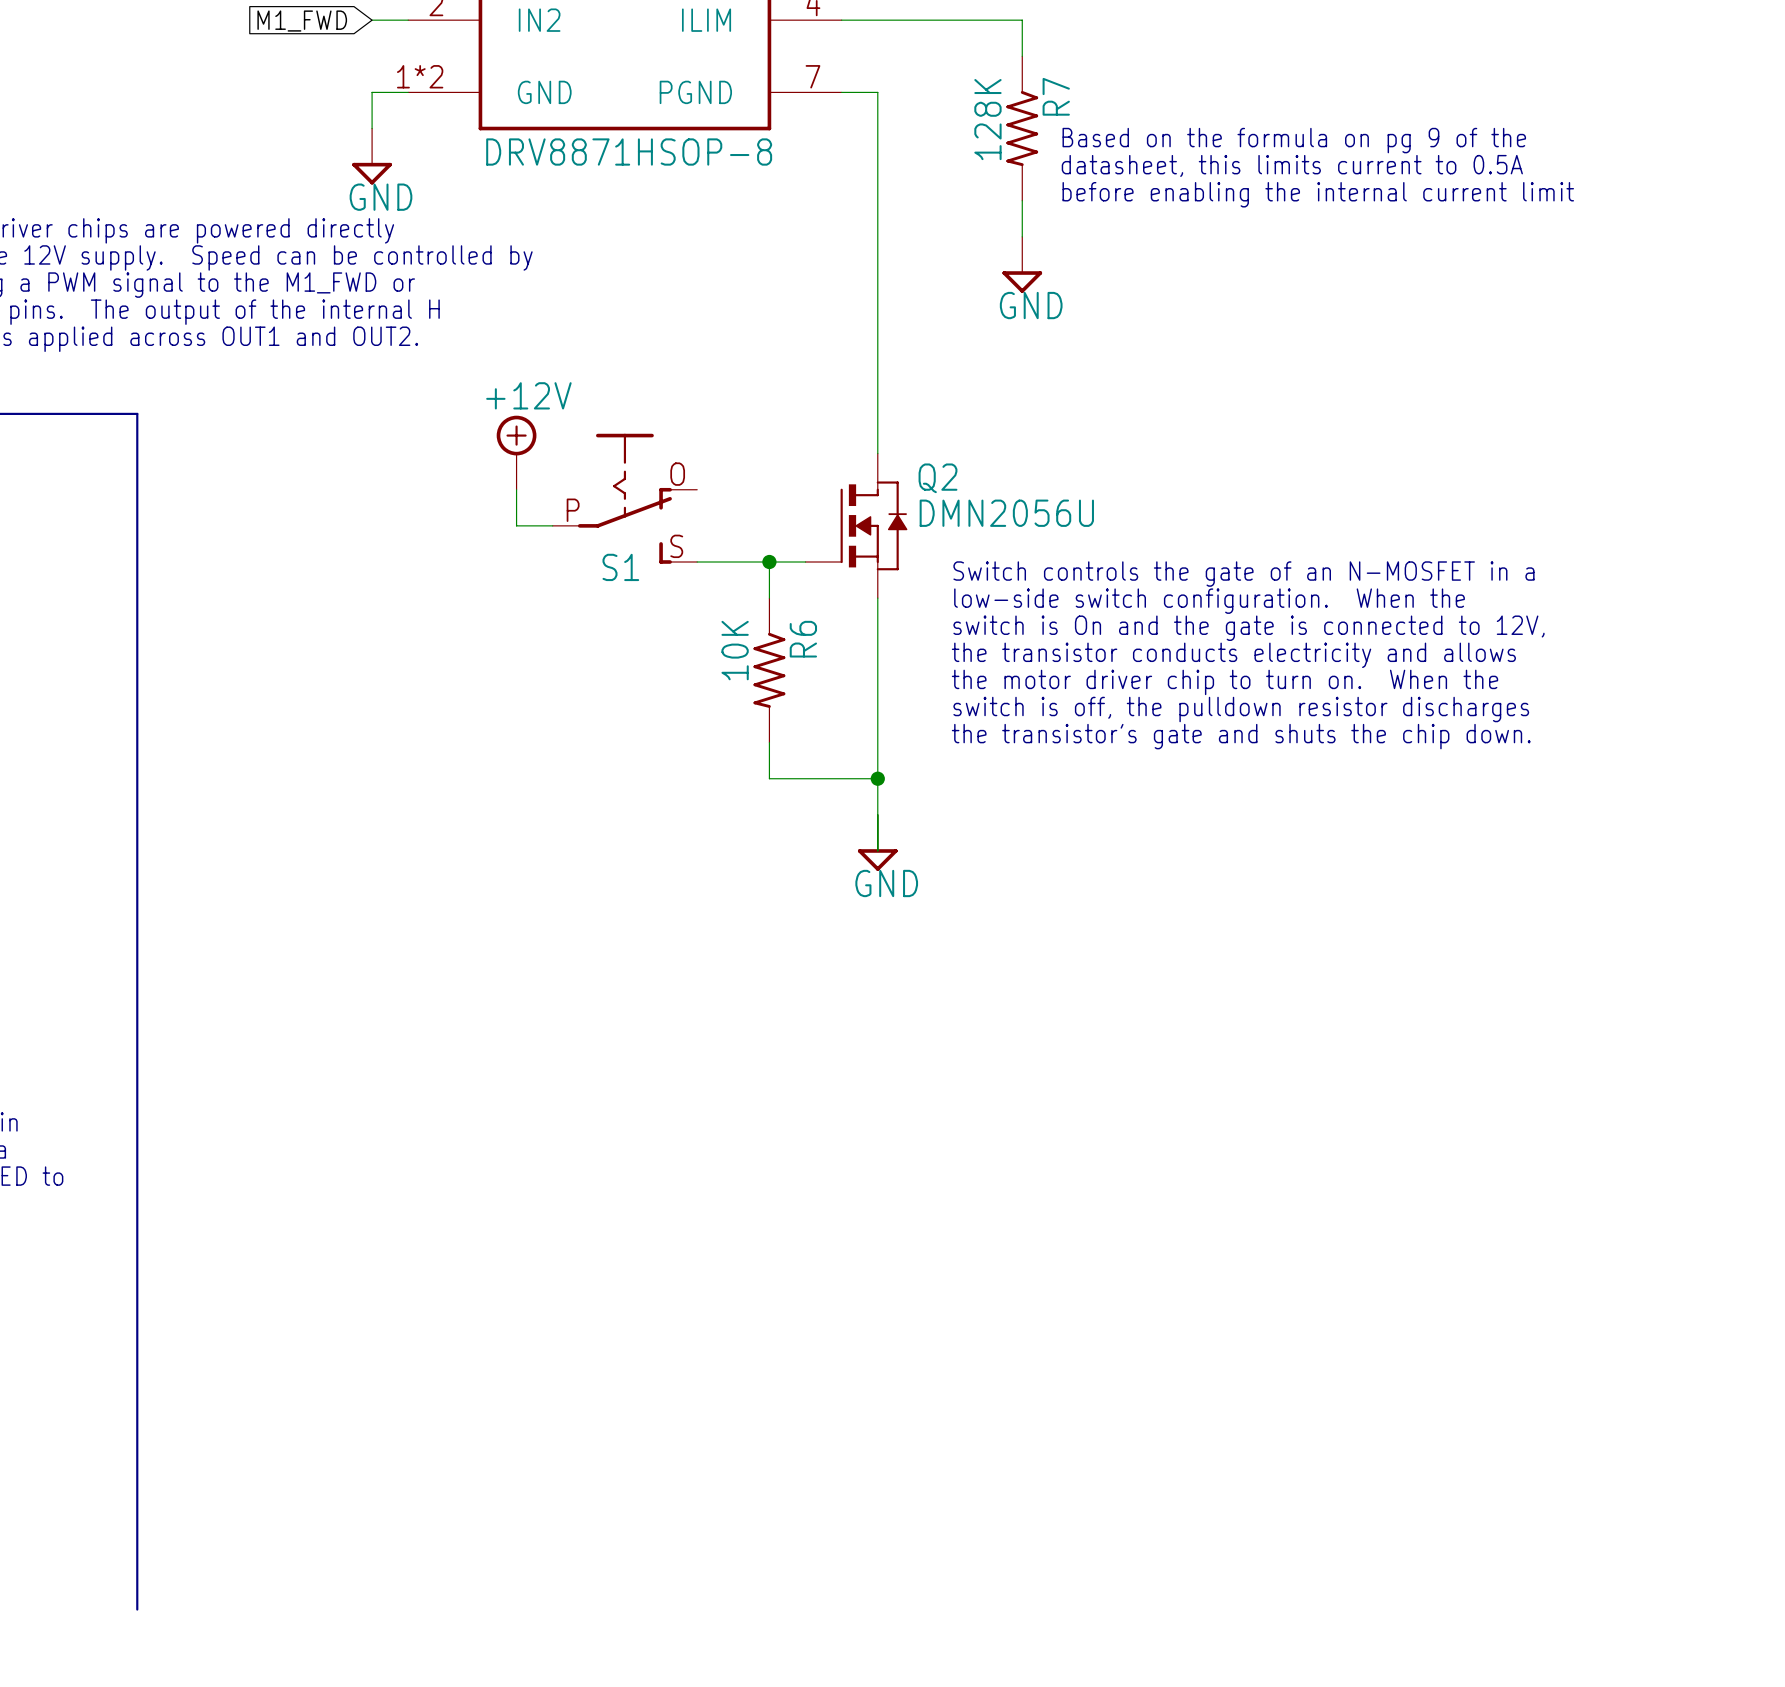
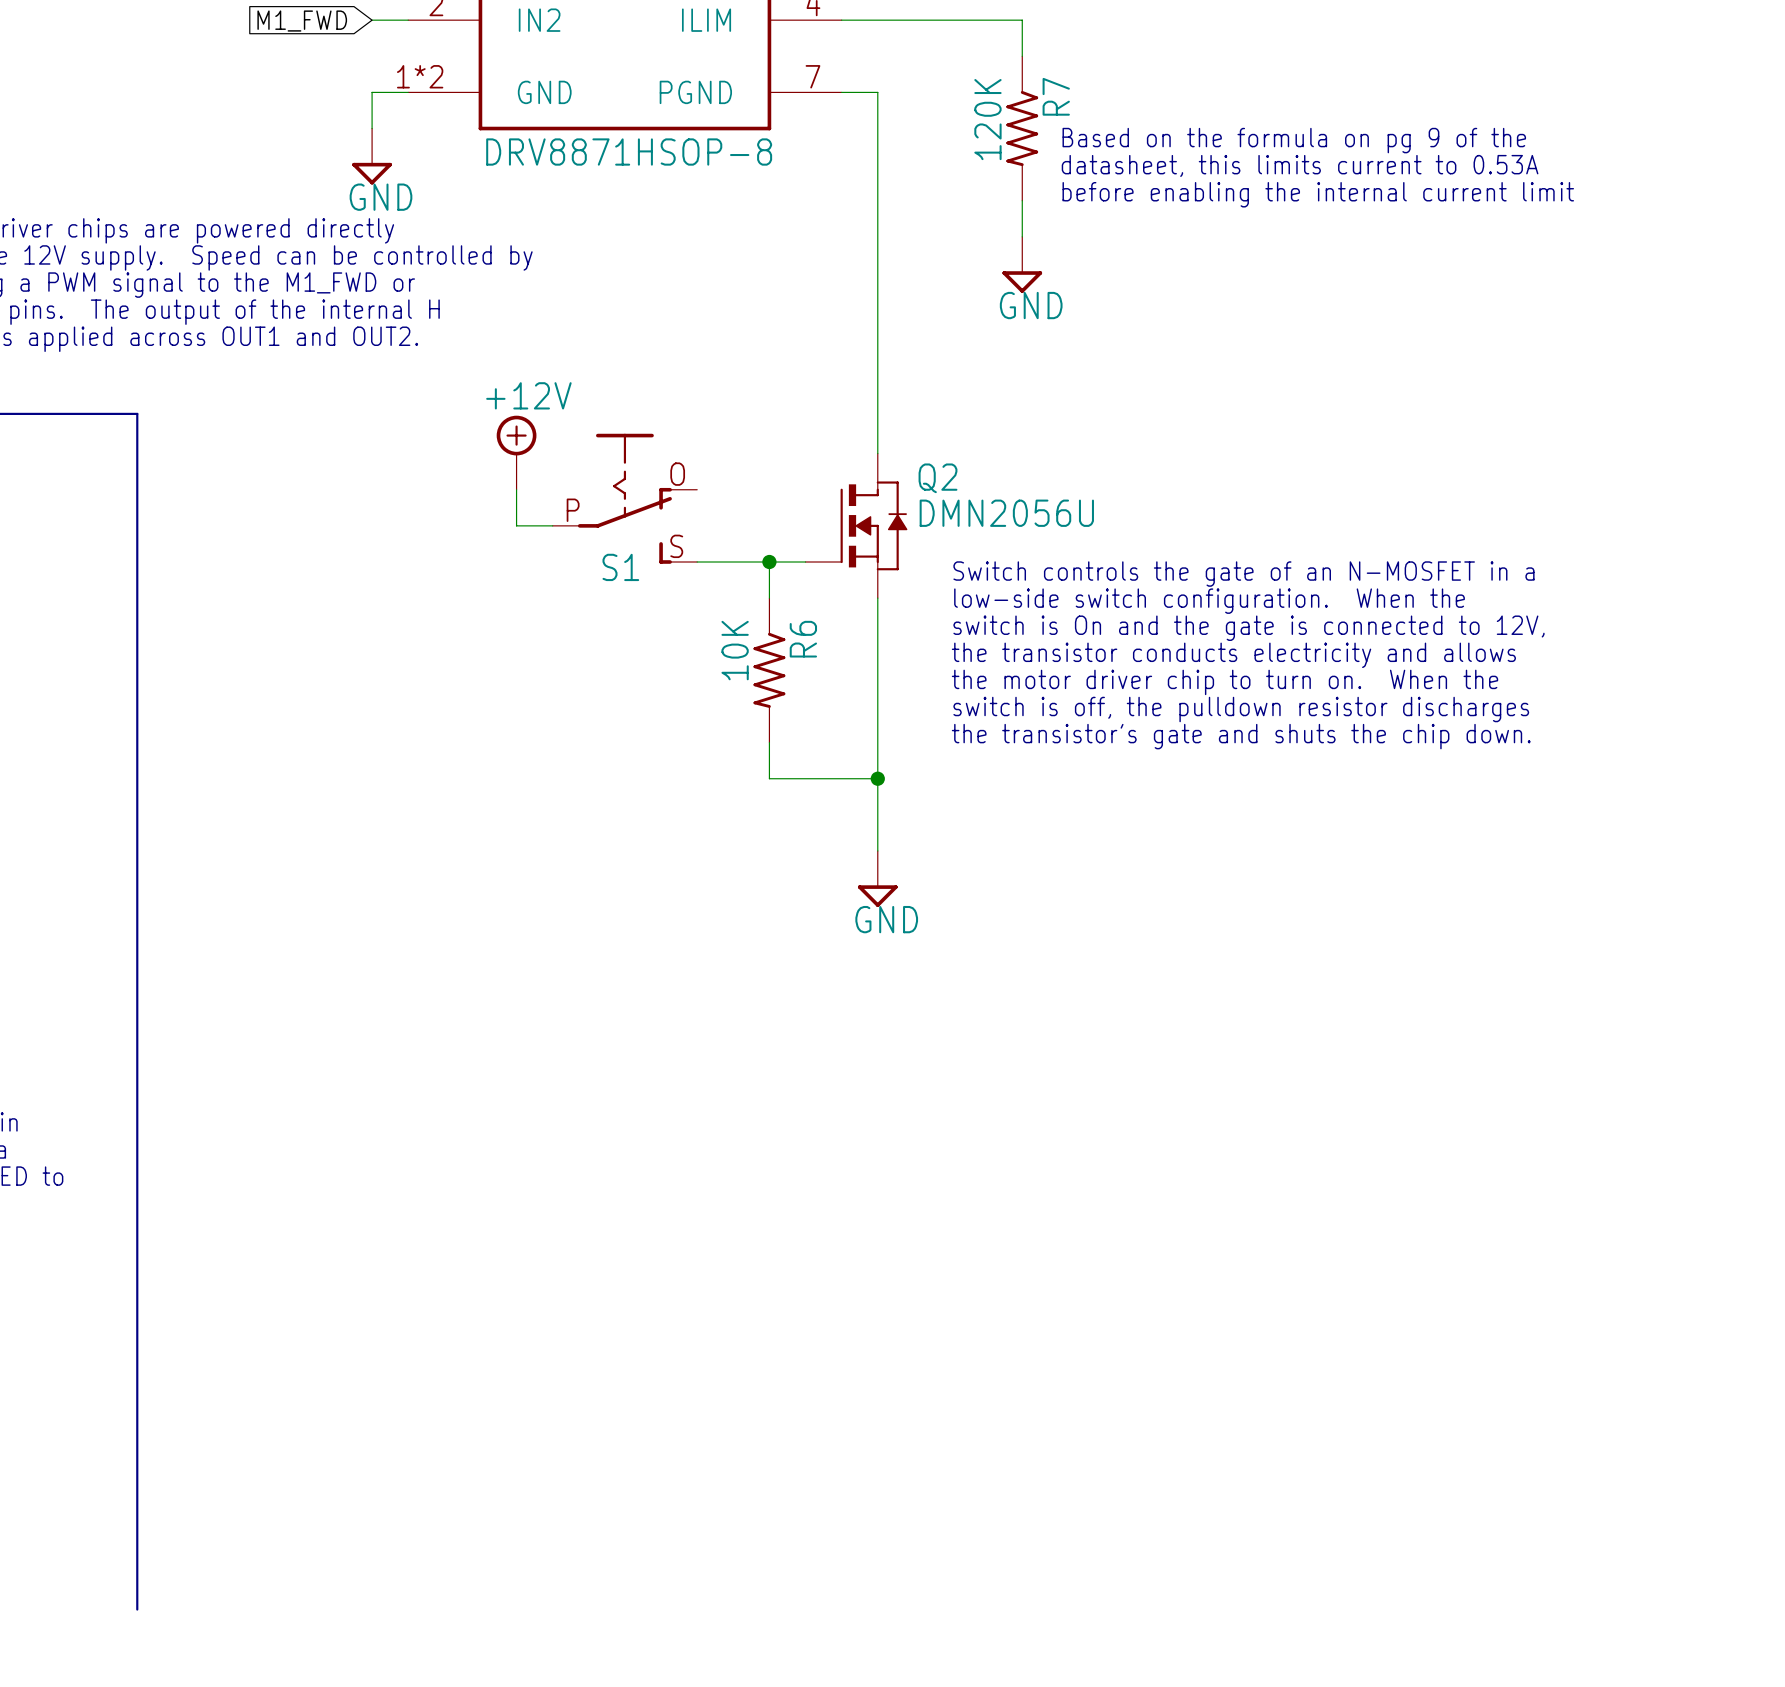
R7 value: 128K (987, 119) -> 120K (987, 119)
text: datasheet, this limits current to 0.5A (1292, 165) -> datasheet, this limits current to 0.53A (1300, 165)
power symbol position: GND (877, 842) -> GND (877, 878)

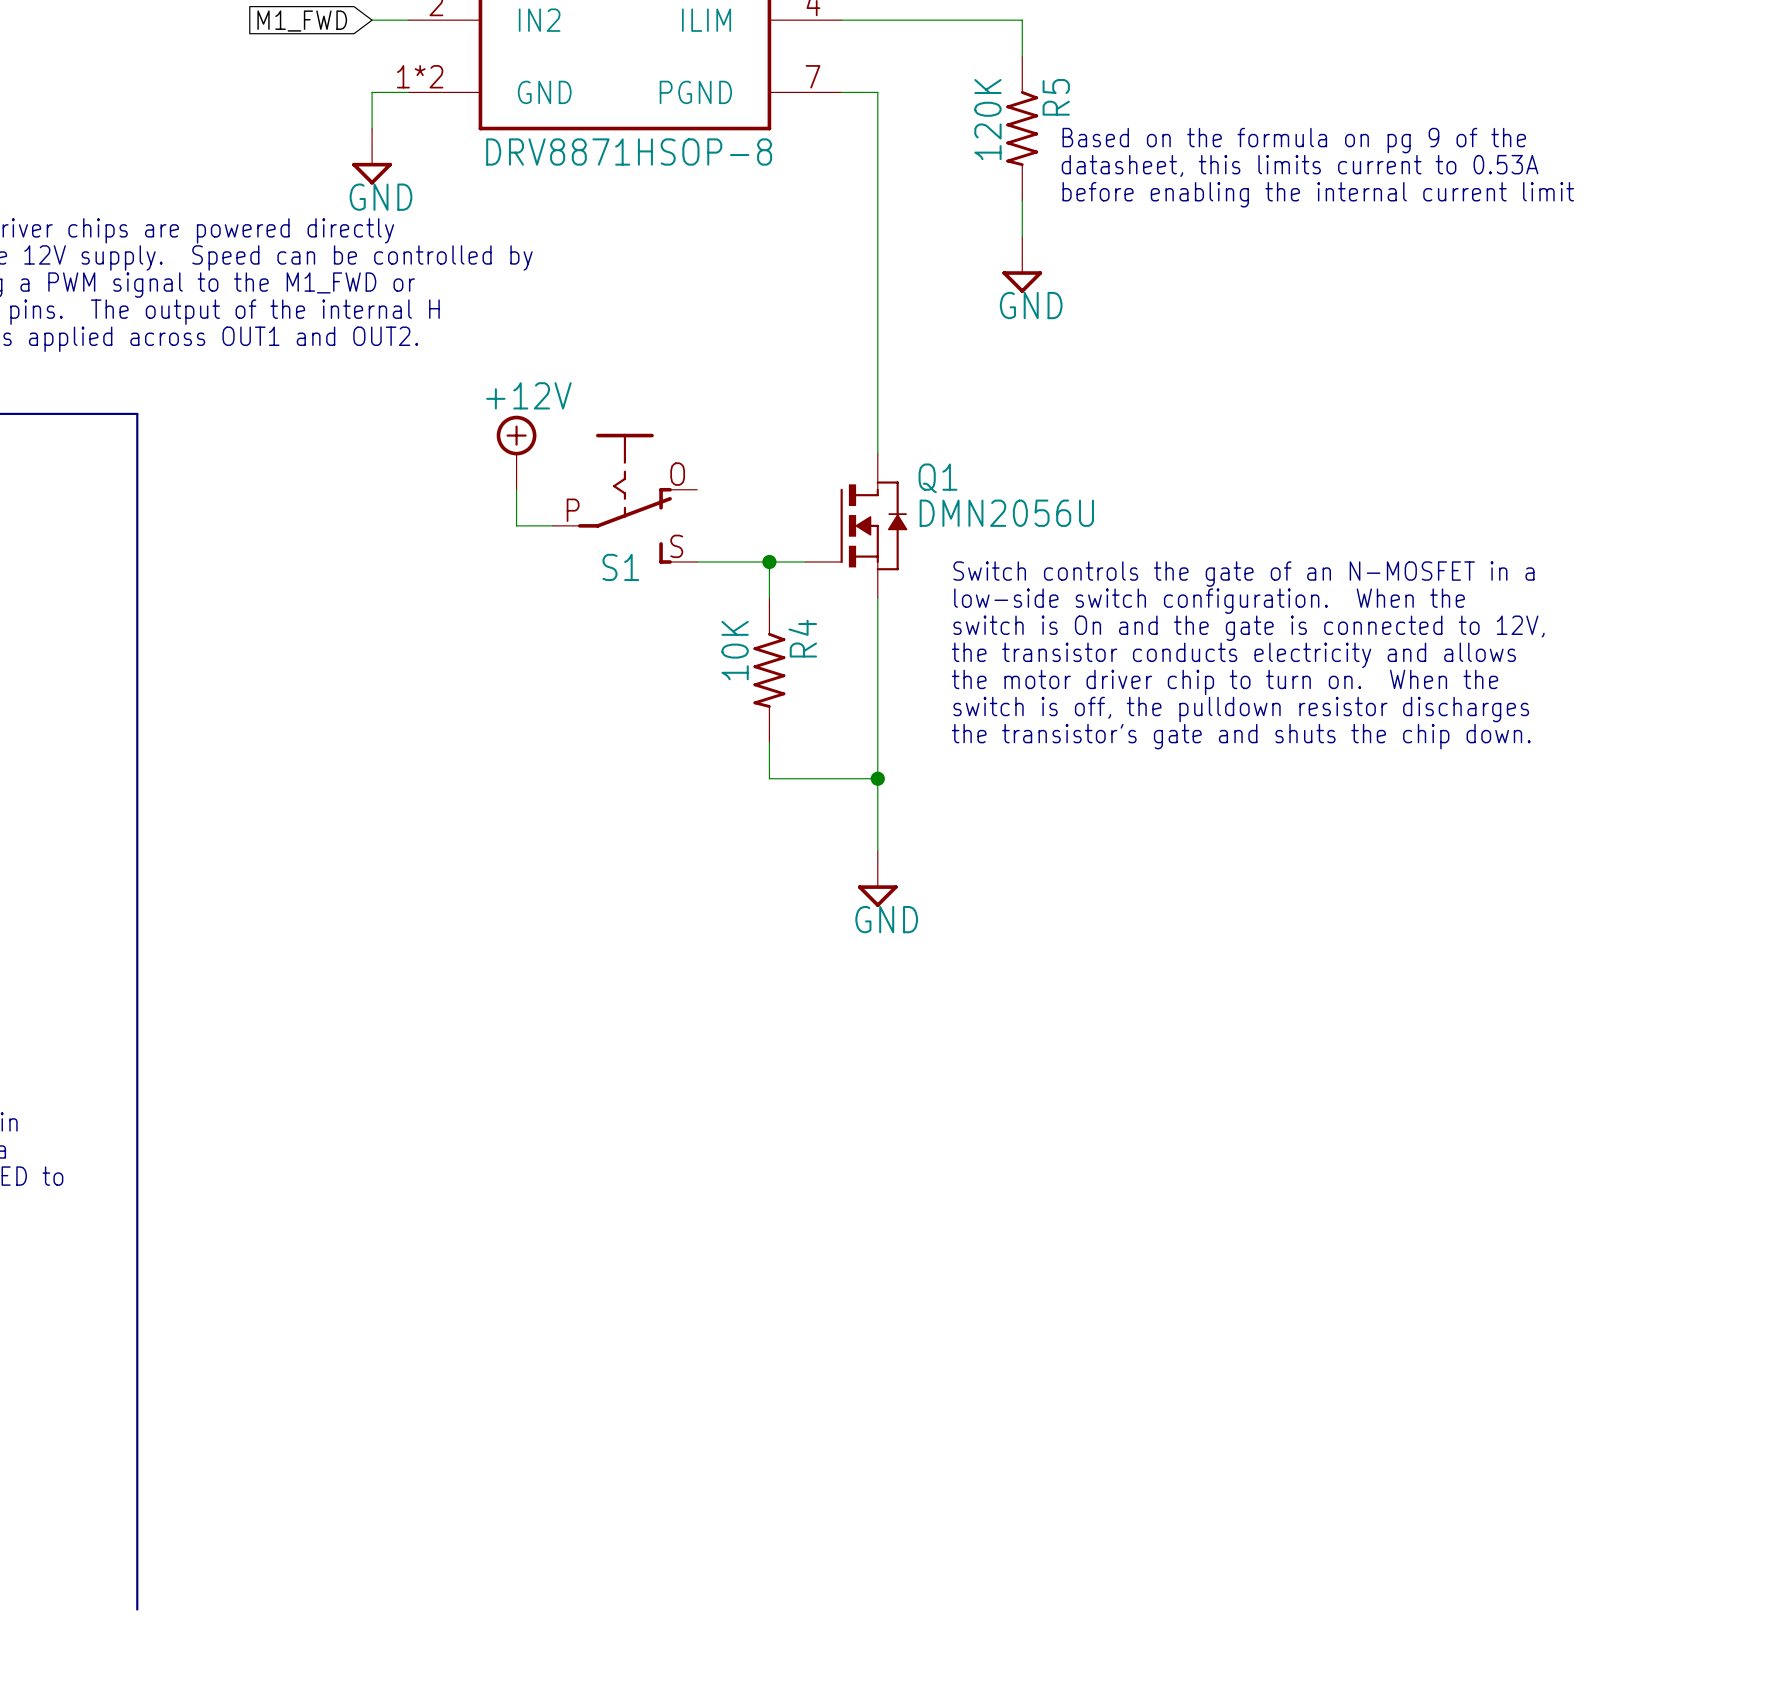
R7 name: R7 (1056, 96) -> R5 (1056, 97)
Q2 name: Q2 (938, 478) -> Q1 (938, 478)
R6 name: R6 (803, 639) -> R4 (802, 638)

